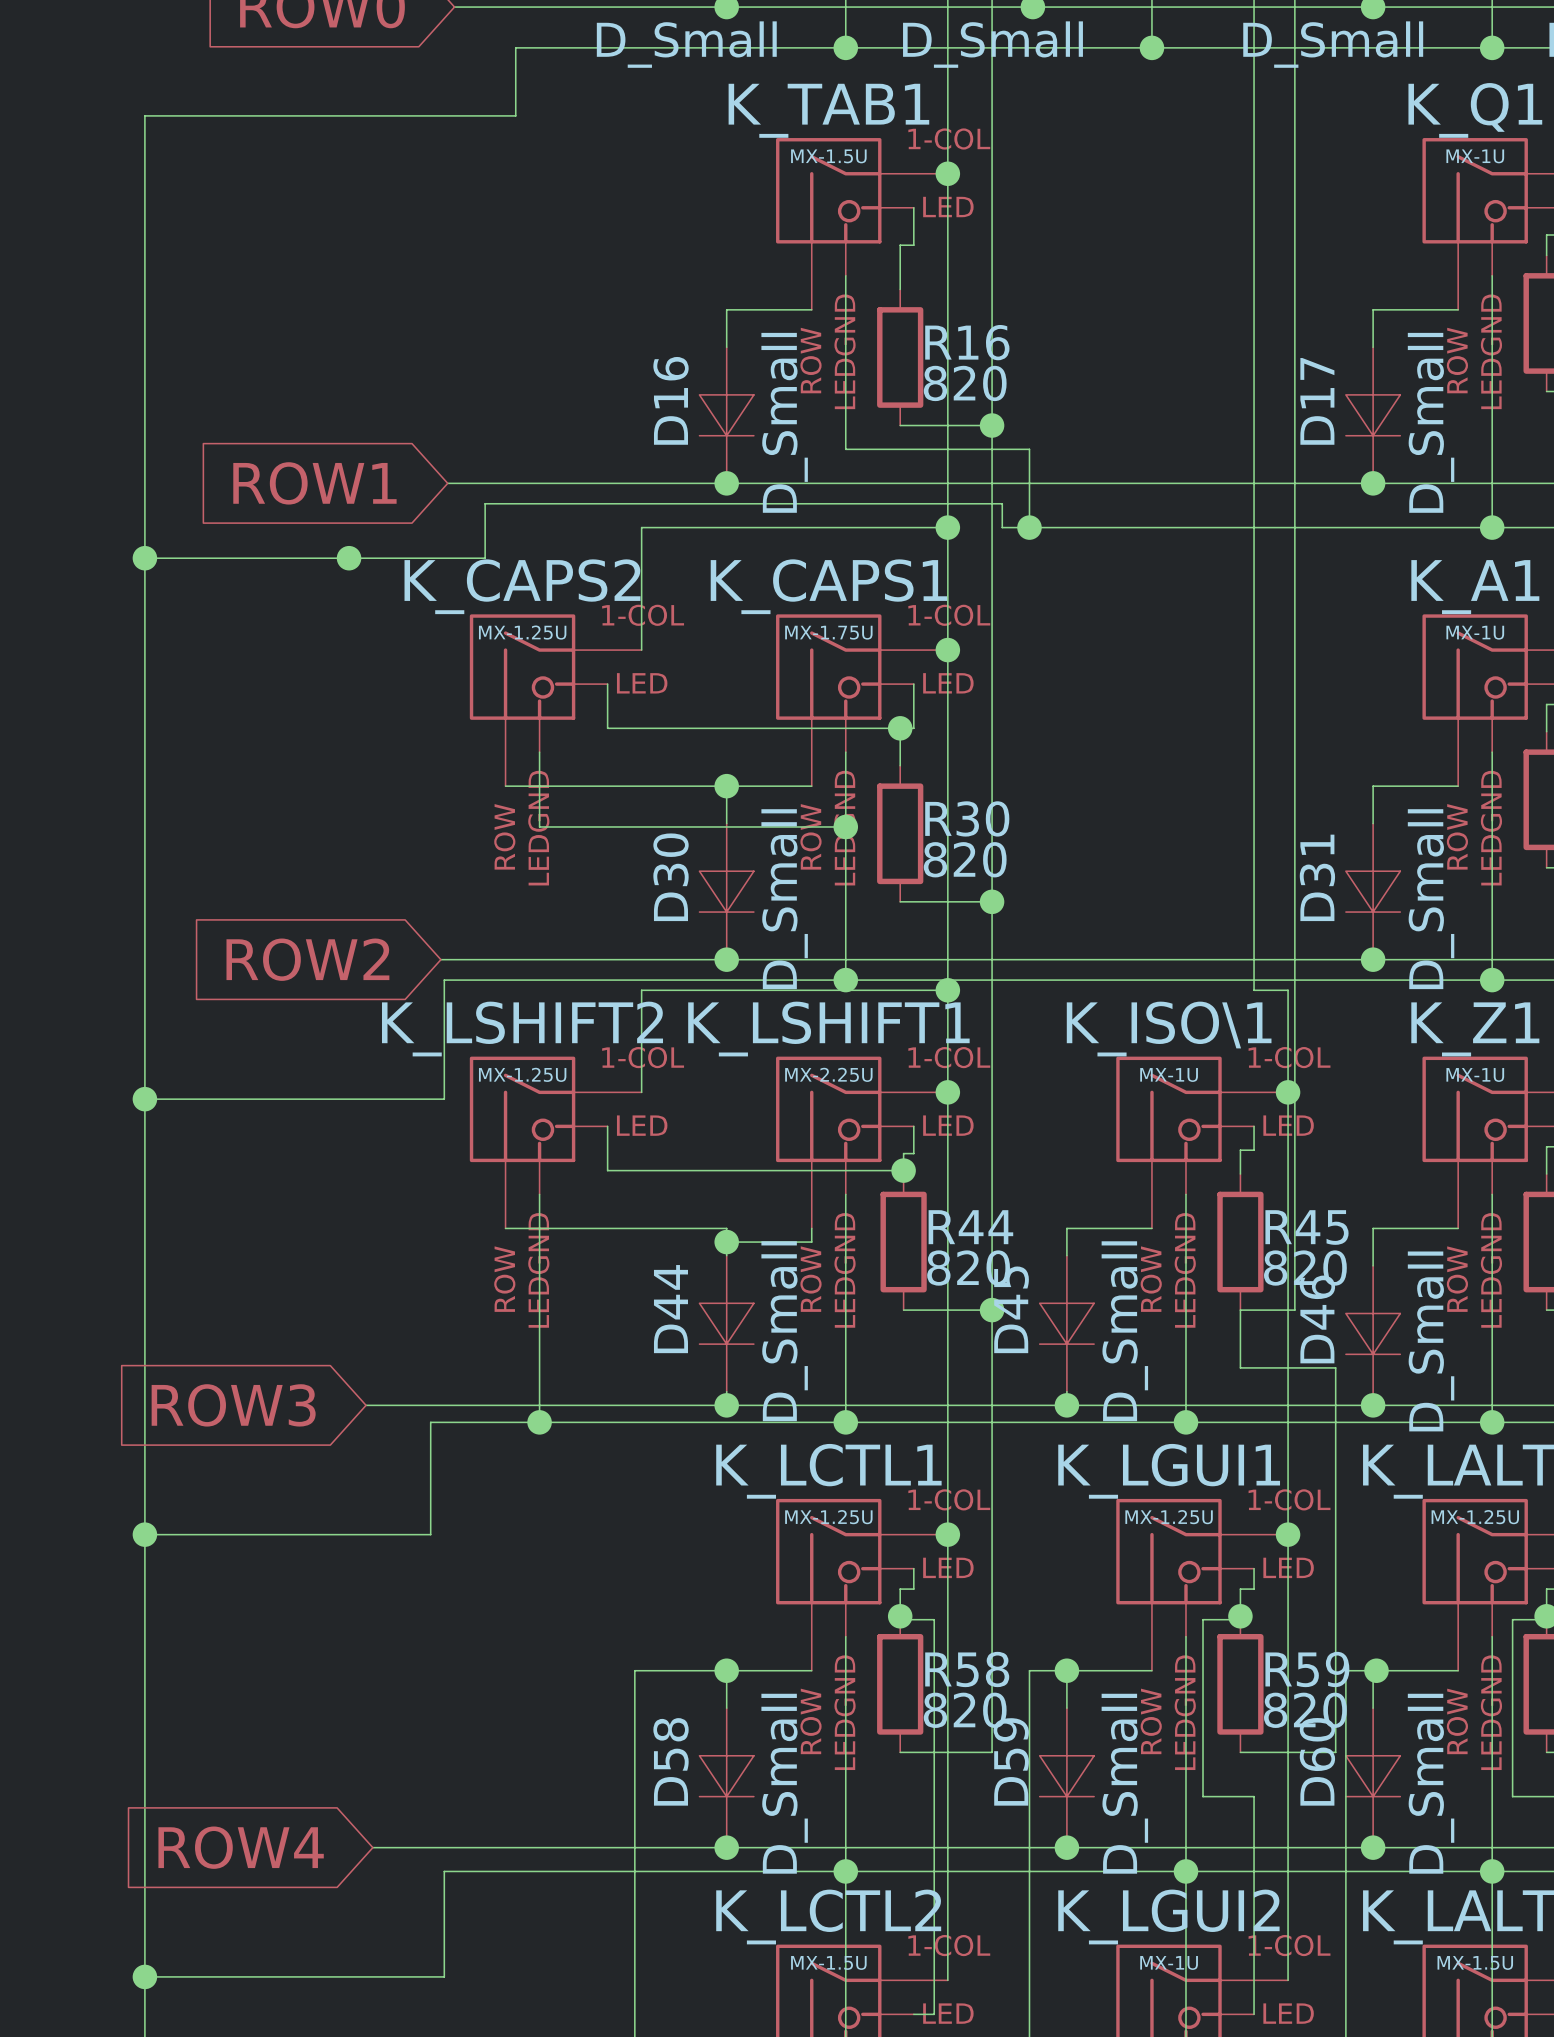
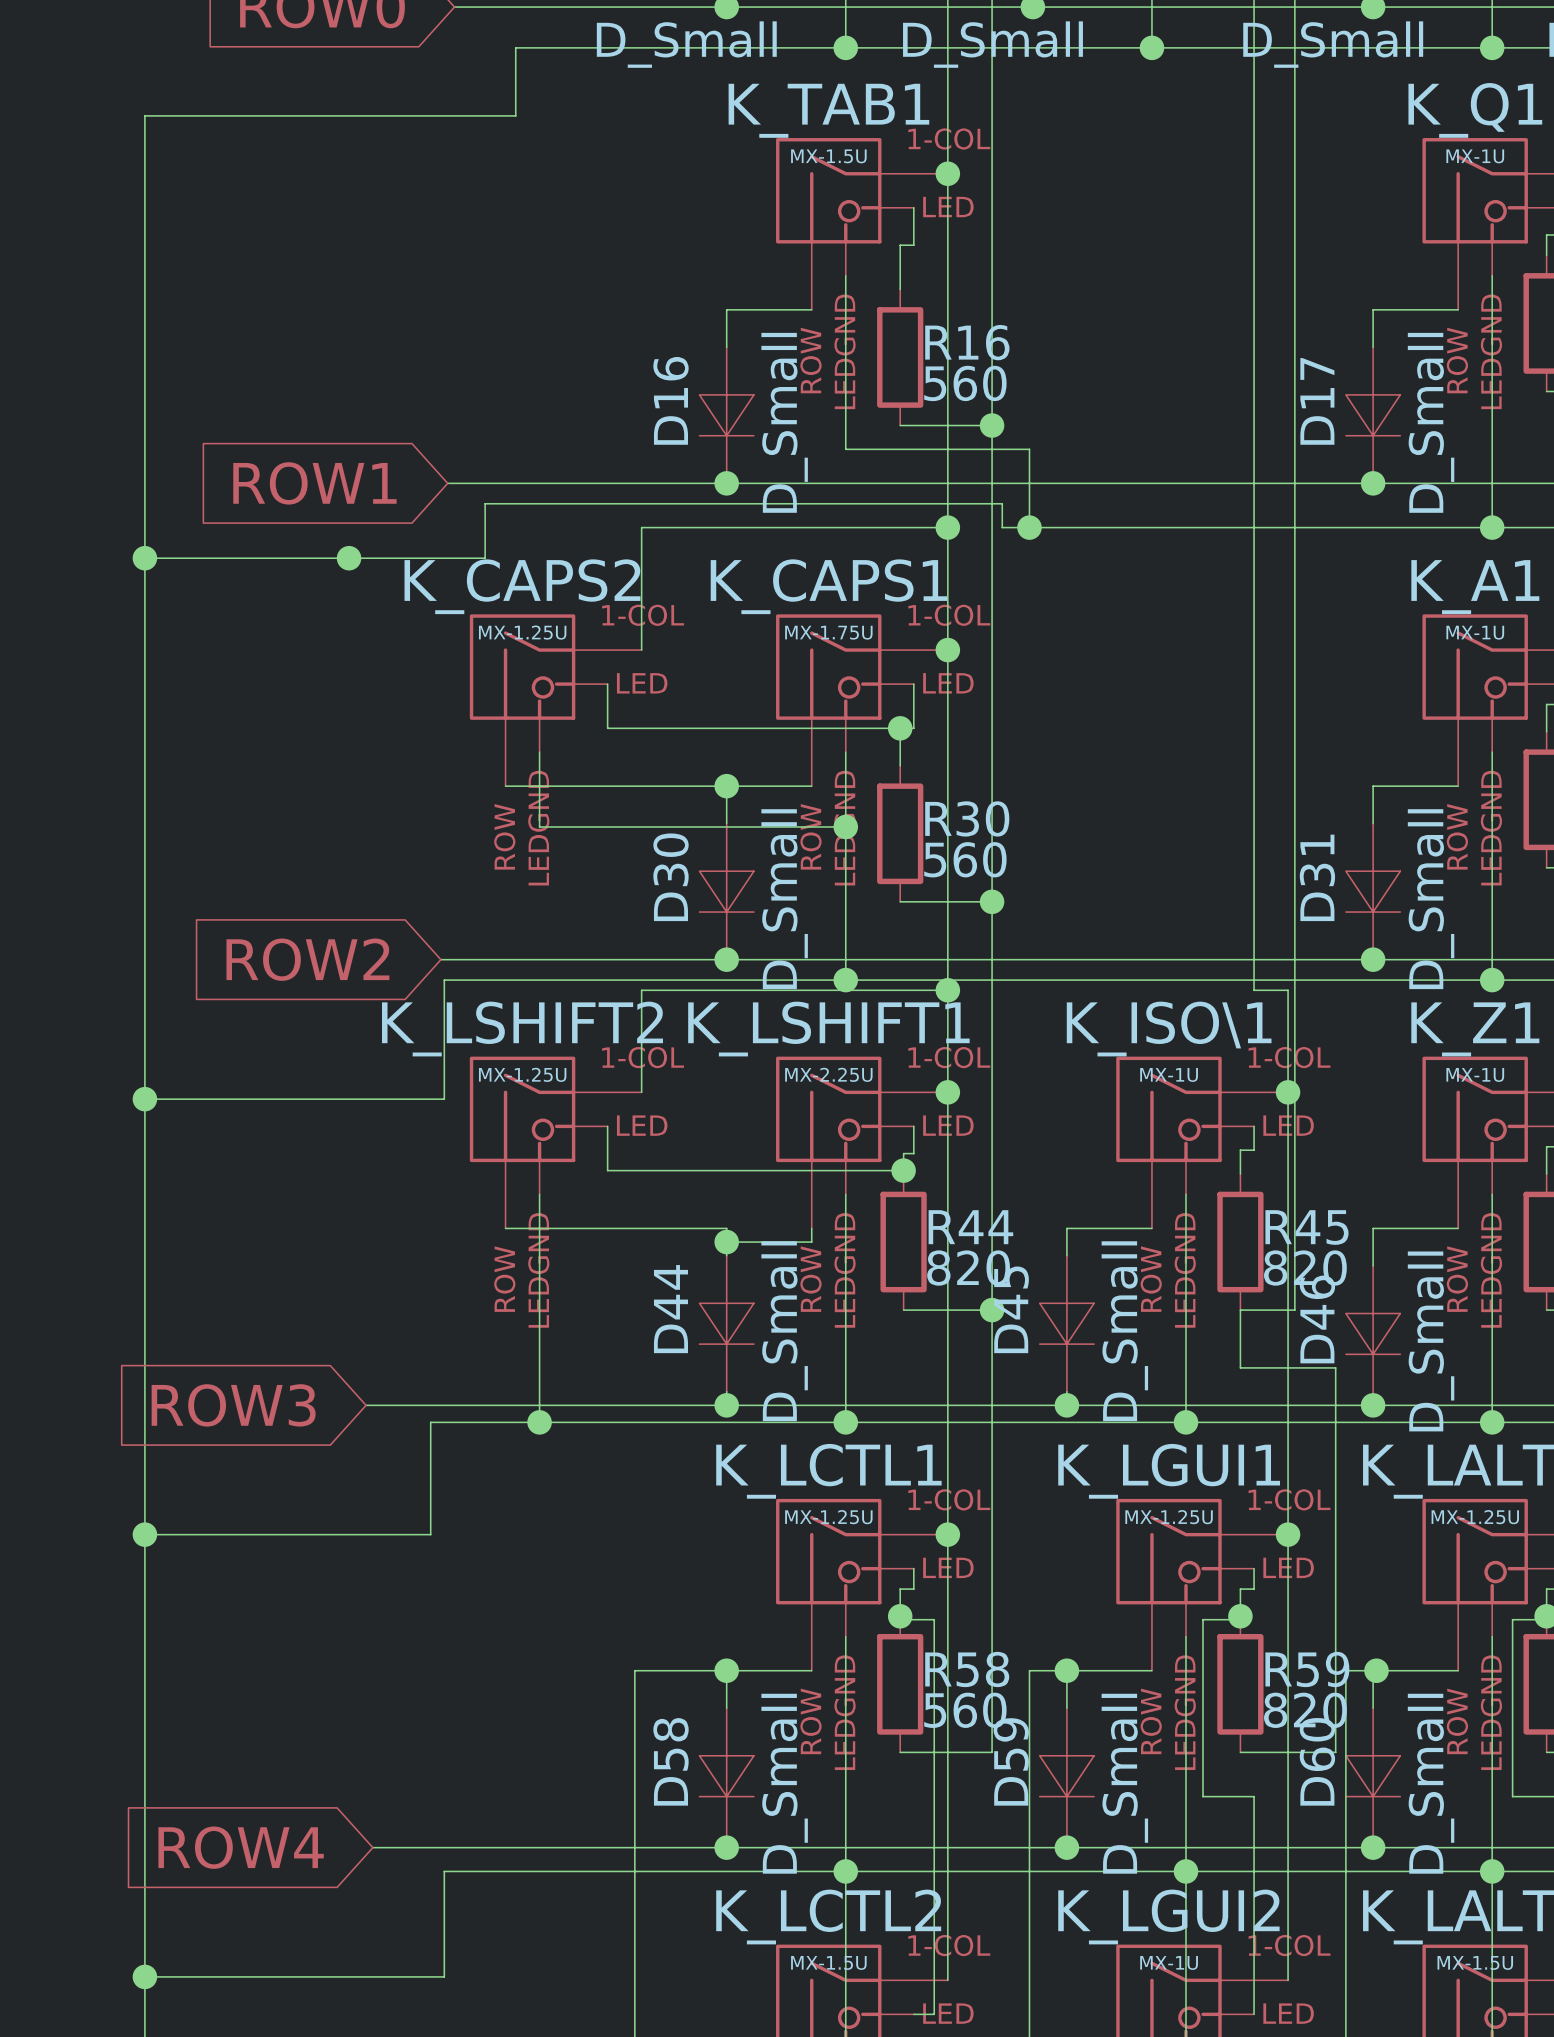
R16 value: 820 (965, 383) -> 560 (965, 383)
R30 value: 820 (965, 859) -> 560 (965, 859)
R58 value: 820 (965, 1710) -> 560 (965, 1710)

